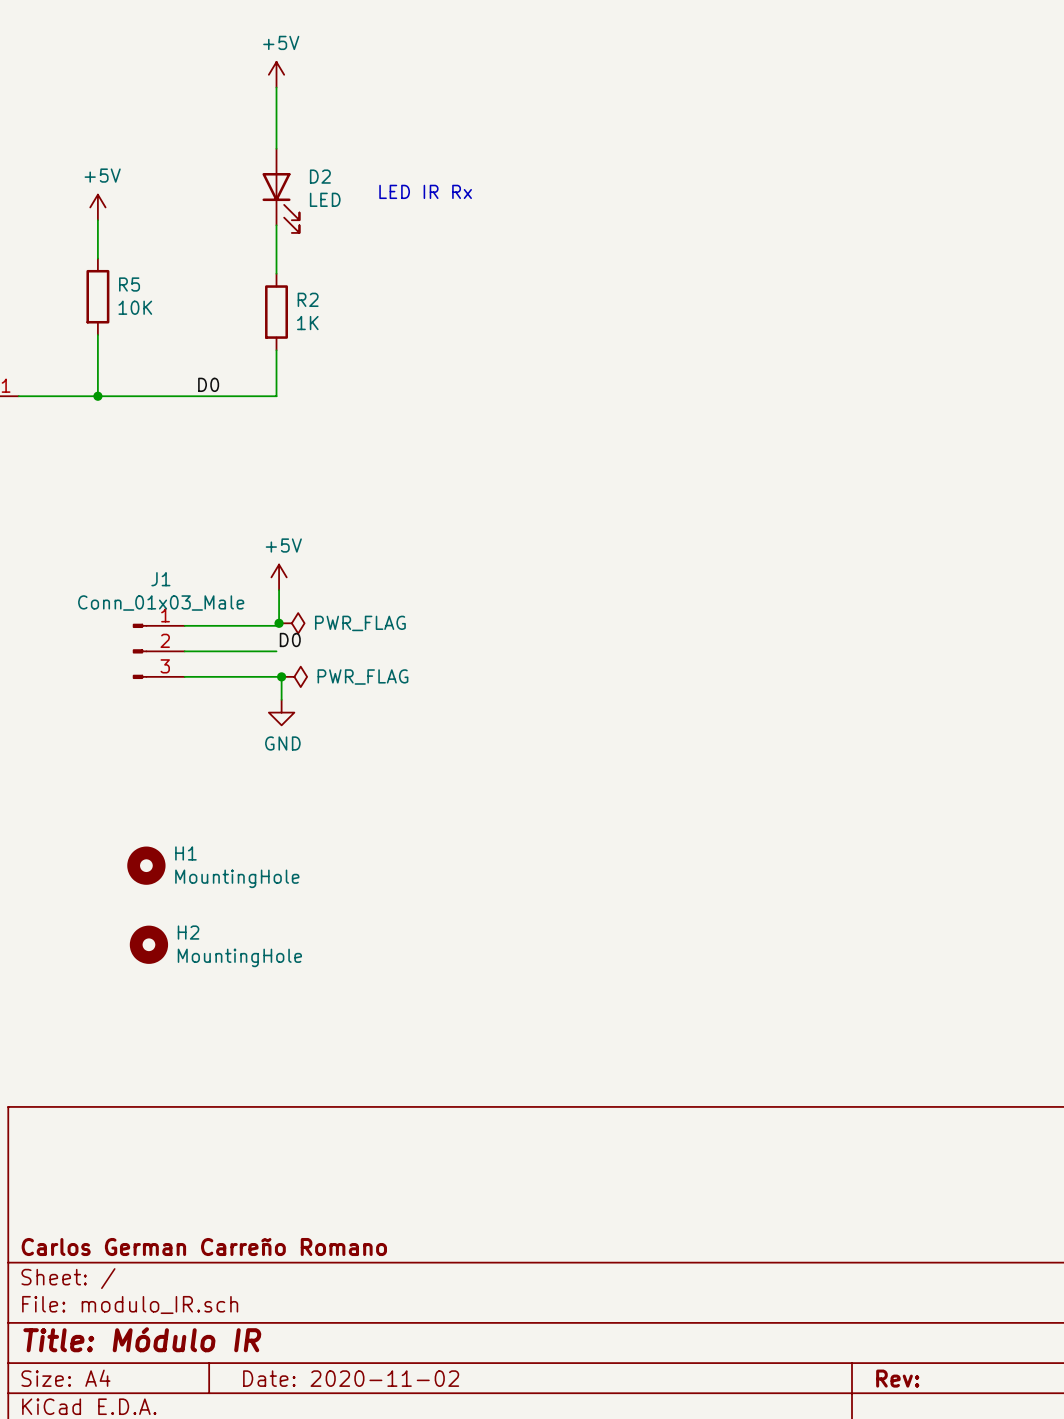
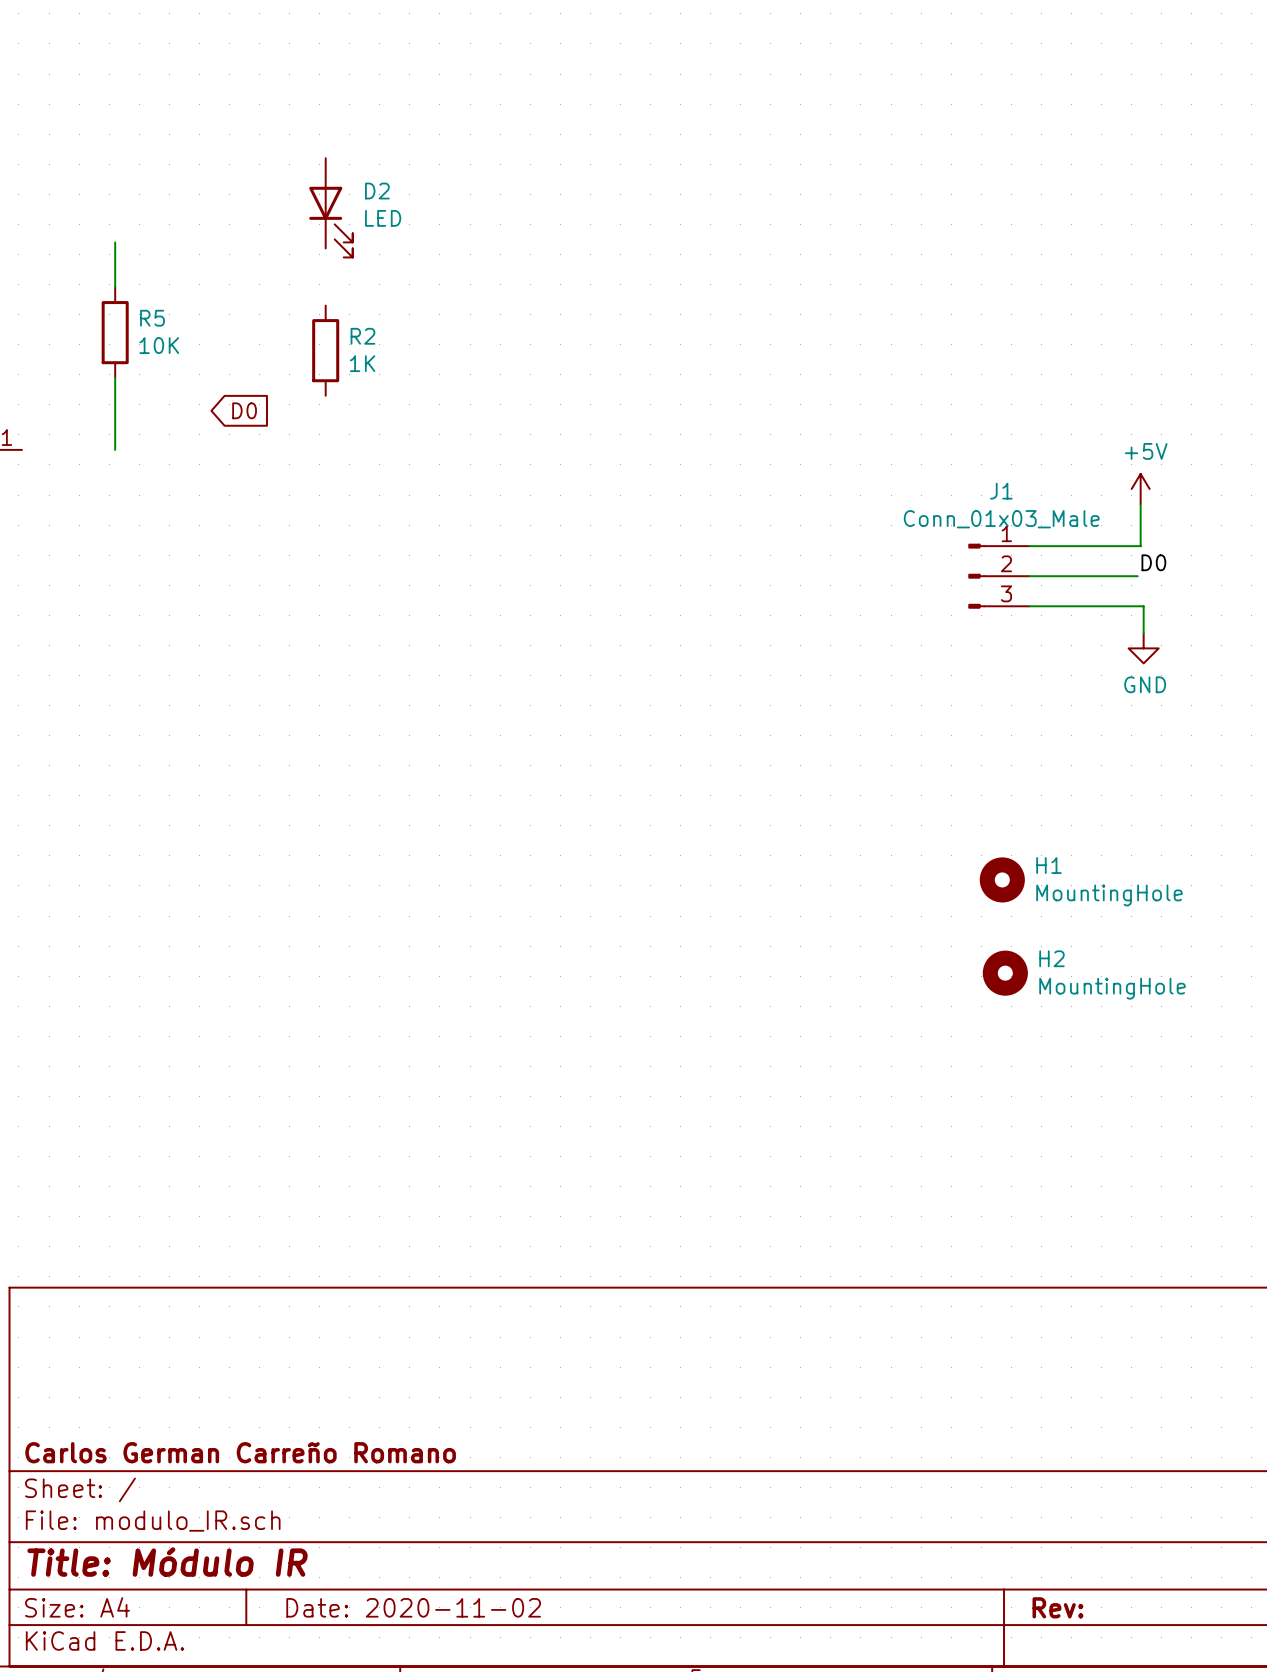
power symbol: +5V (276, 74) -> none
wire: (276, 87) (276, 148) -> none
text: LED IR Rx (425, 191) -> none
power symbol: +5V (97, 207) -> none
wire: (276, 225) (276, 273) -> none
wire: (276, 350) (276, 396) (18, 396) -> none
global label: none -> D0 (244, 410)
label: D0 (208, 384) -> none
junction: (97, 396) -> none
power symbol: none -> +5V (1140, 489)
wire: none -> (1140, 504) (1140, 546) (1029, 546)
label: none -> D0 (1153, 562)
wire: none -> (1029, 576) (1137, 576)
wire: none -> (1029, 606) (1143, 606) (1143, 633)
power symbol: none -> GND (1143, 648)
power symbol: +5V (279, 577) -> none
wire: (279, 590) (279, 625) (184, 625) -> none
junction: (279, 623) -> none
power symbol: PWR_FLAG (291, 623) -> none
label: D0 (290, 639) -> none
J1 position: (158, 651) -> (998, 576)
wire: (184, 651) (276, 651) -> none
wire: (184, 676) (281, 676) (281, 699) -> none
junction: (281, 676) -> none
power symbol: PWR_FLAG (294, 676) -> none
power symbol: GND (281, 712) -> none
H1 position: (146, 865) -> (1002, 879)
H2 position: (148, 944) -> (1005, 973)

